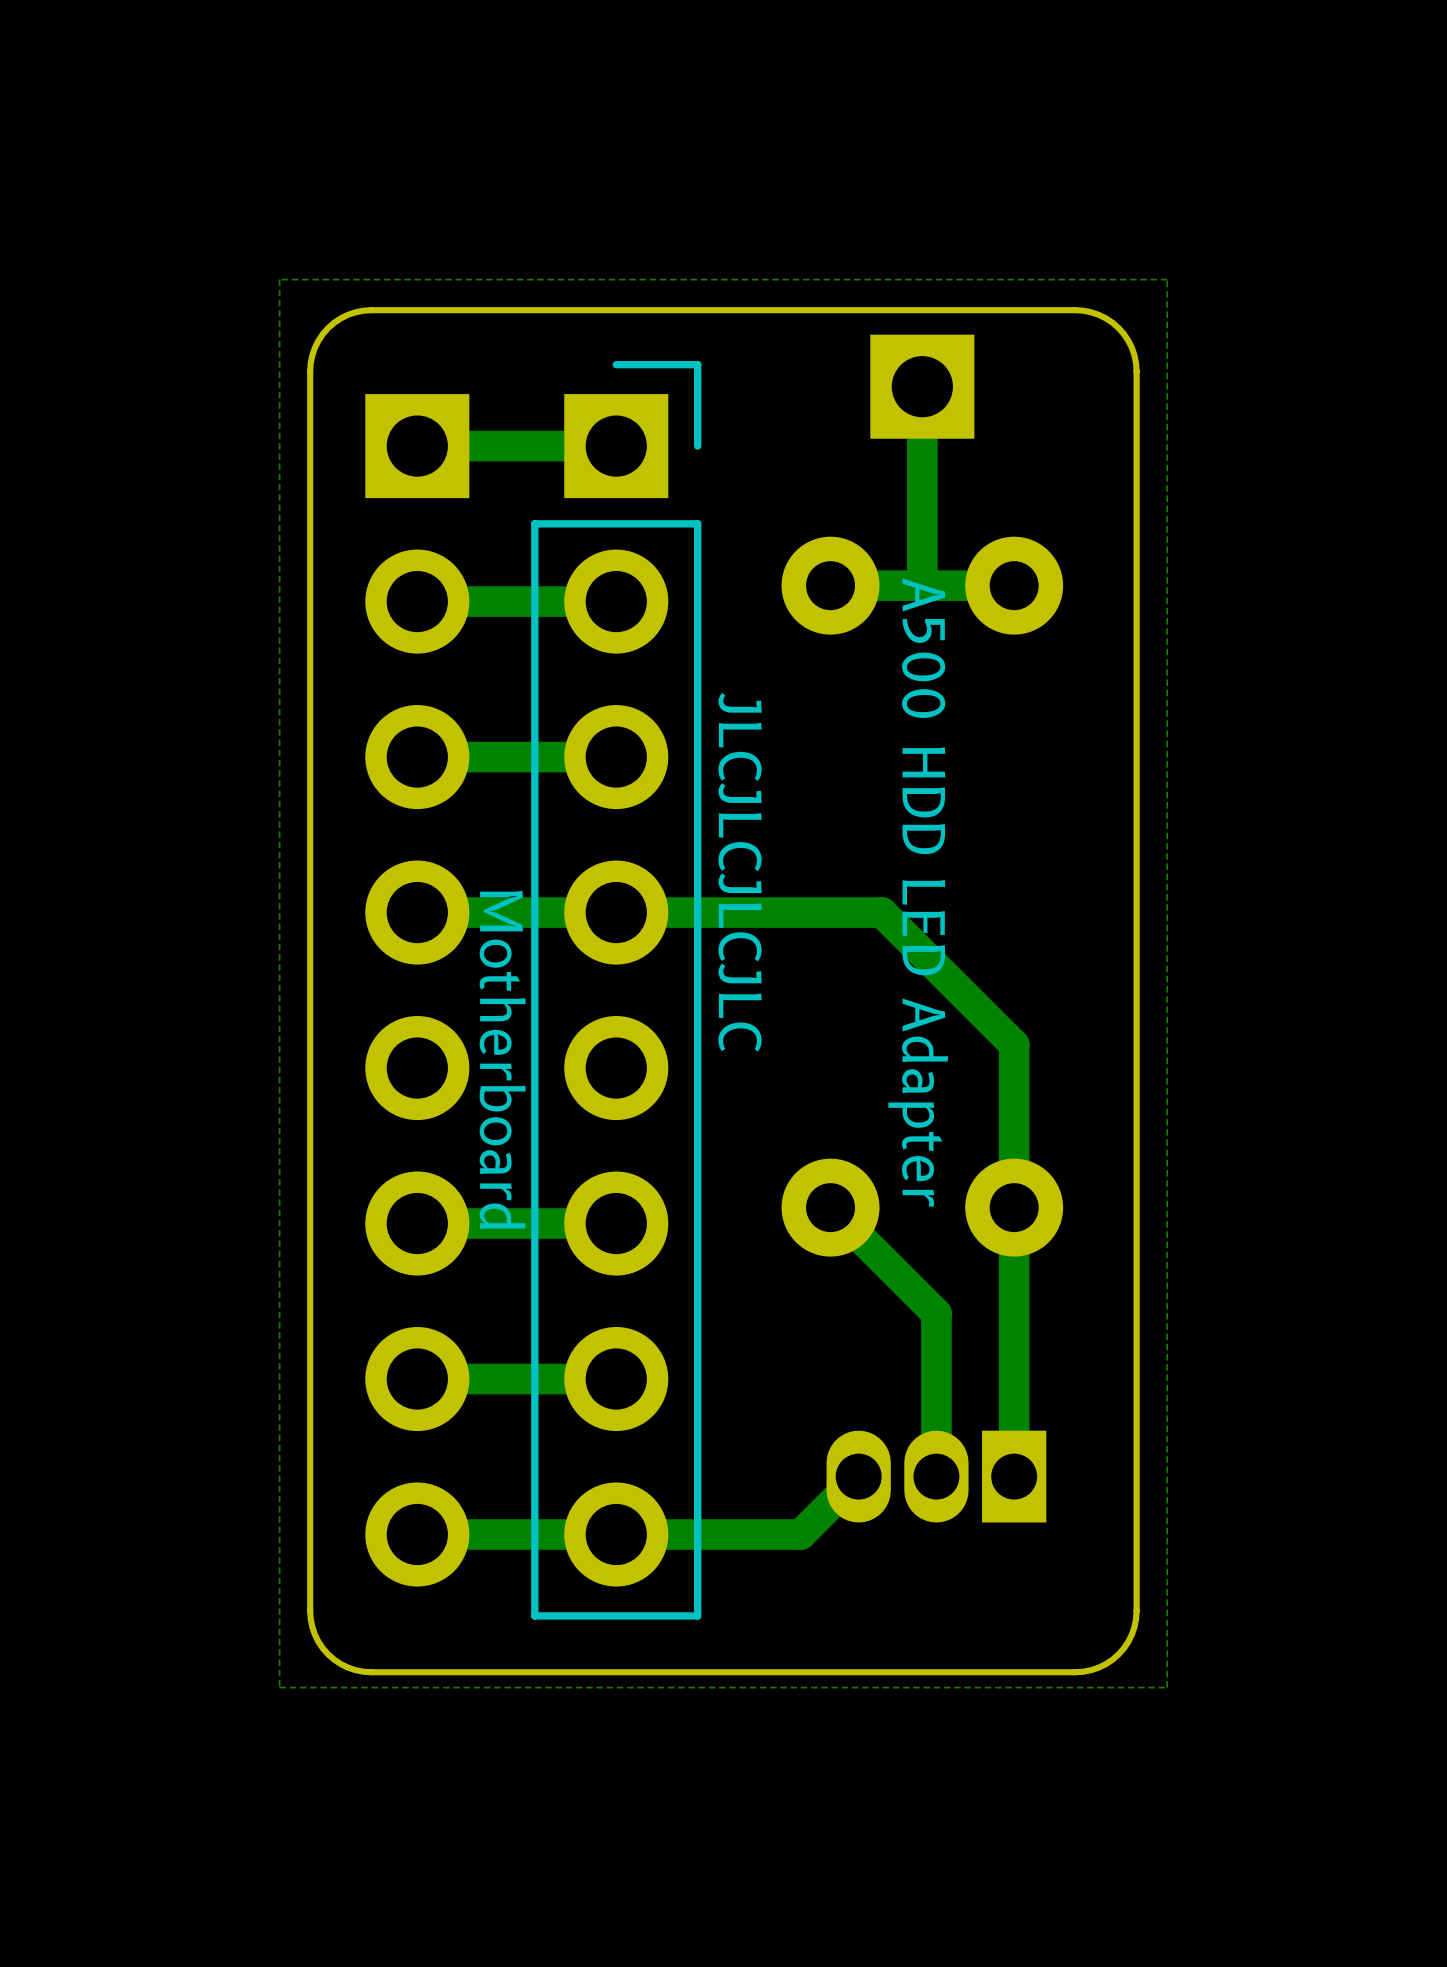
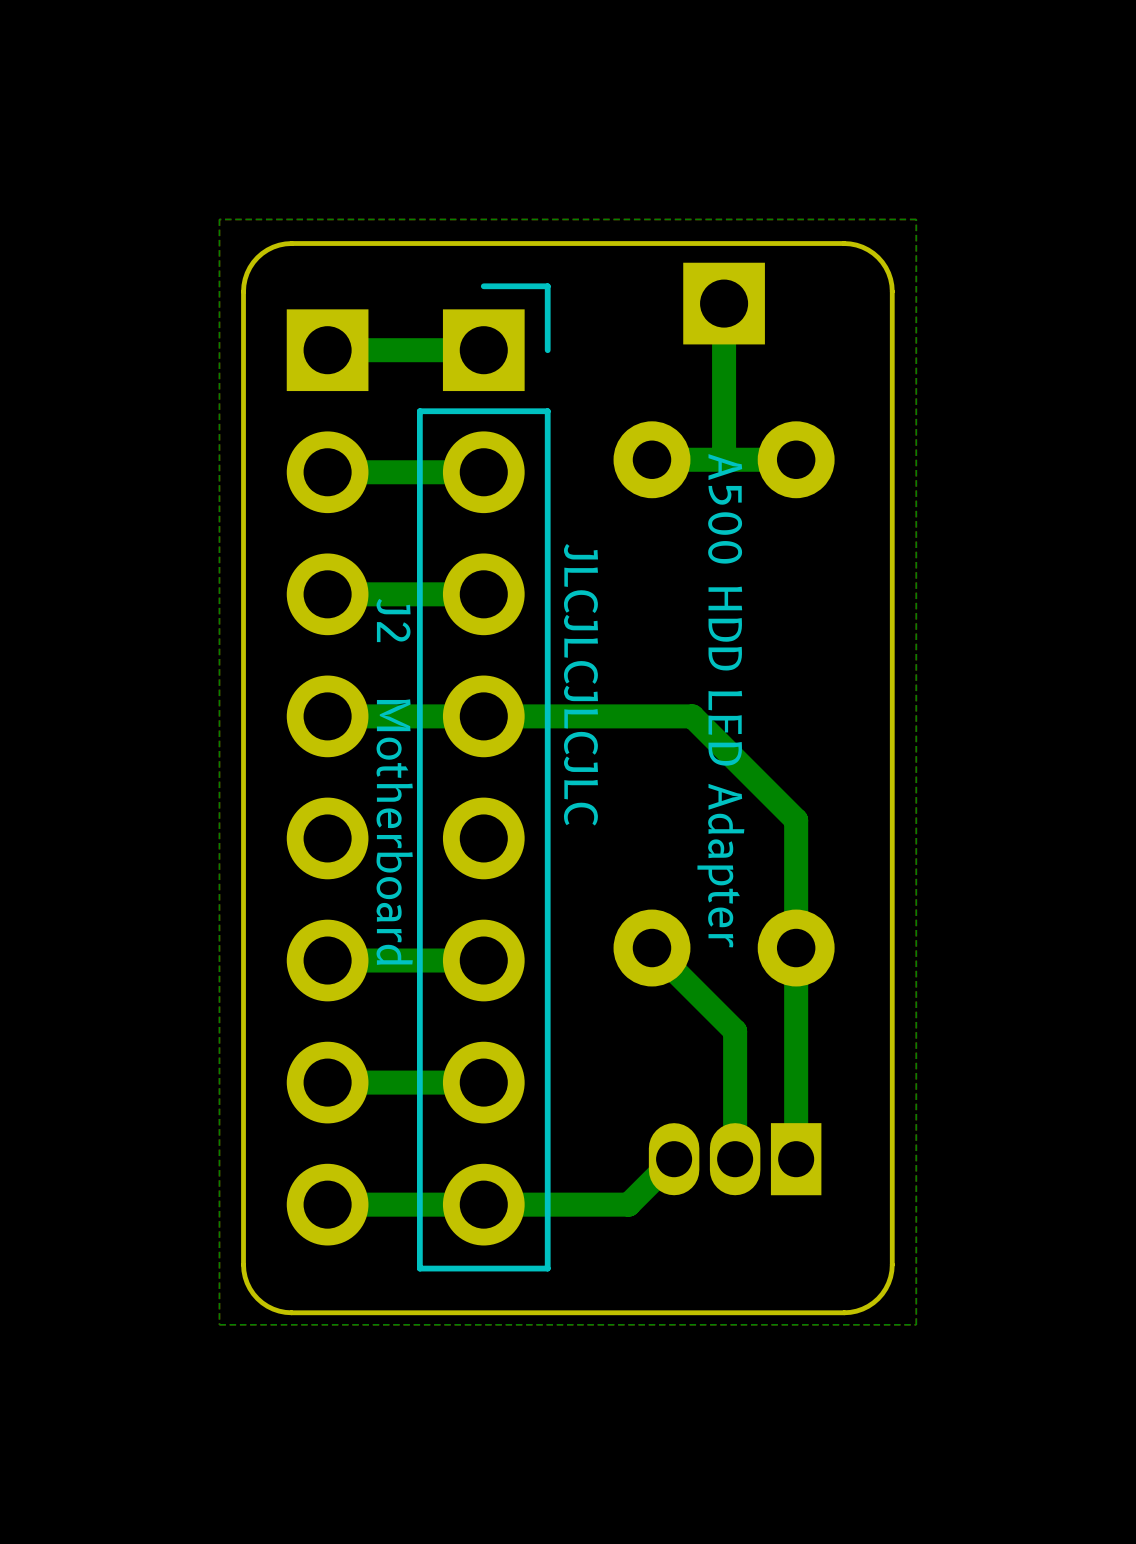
J2 name: none -> J2 (393, 620)

